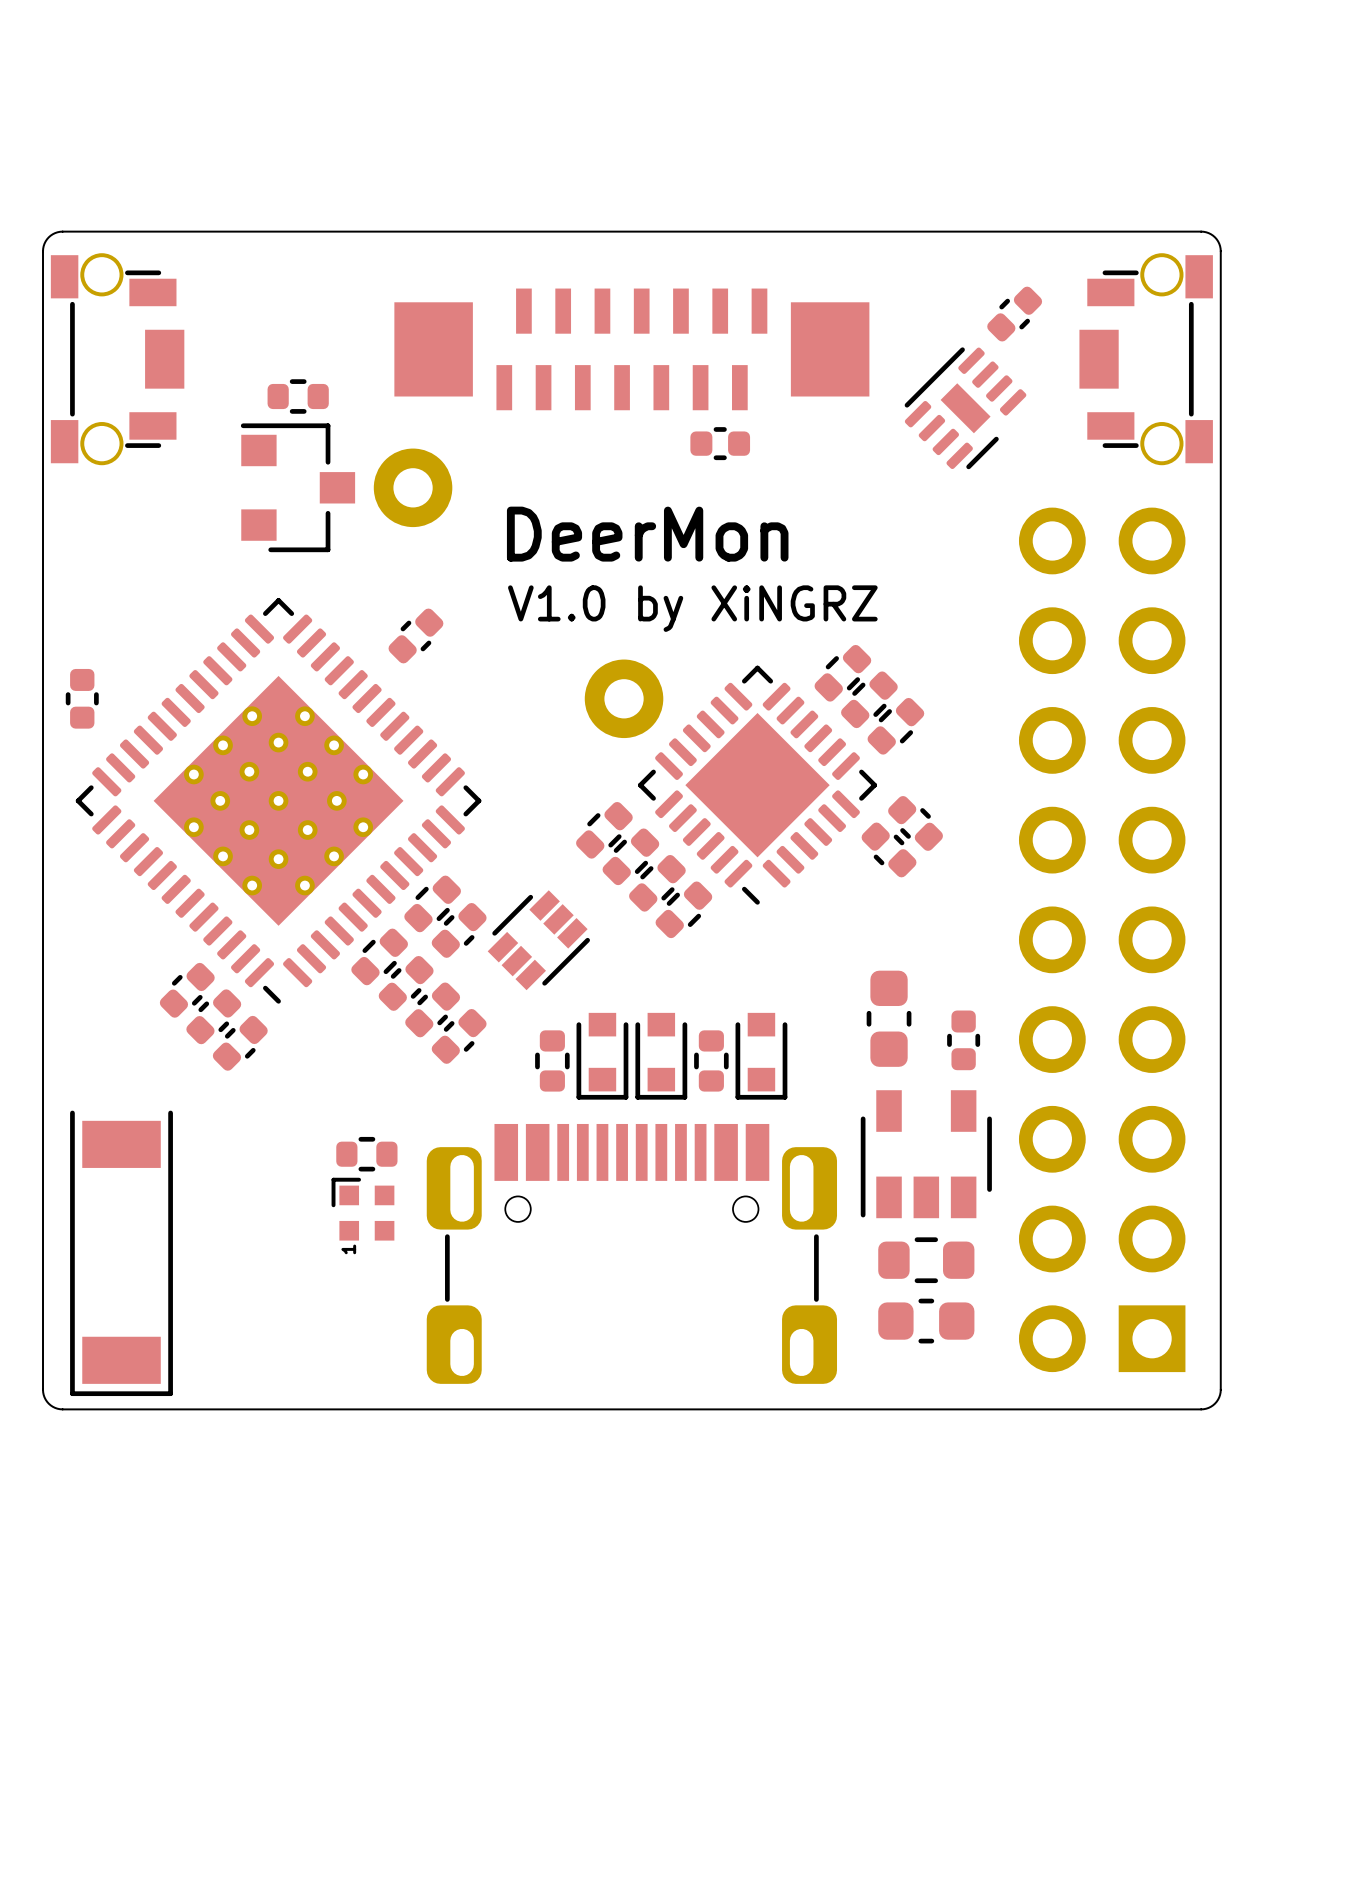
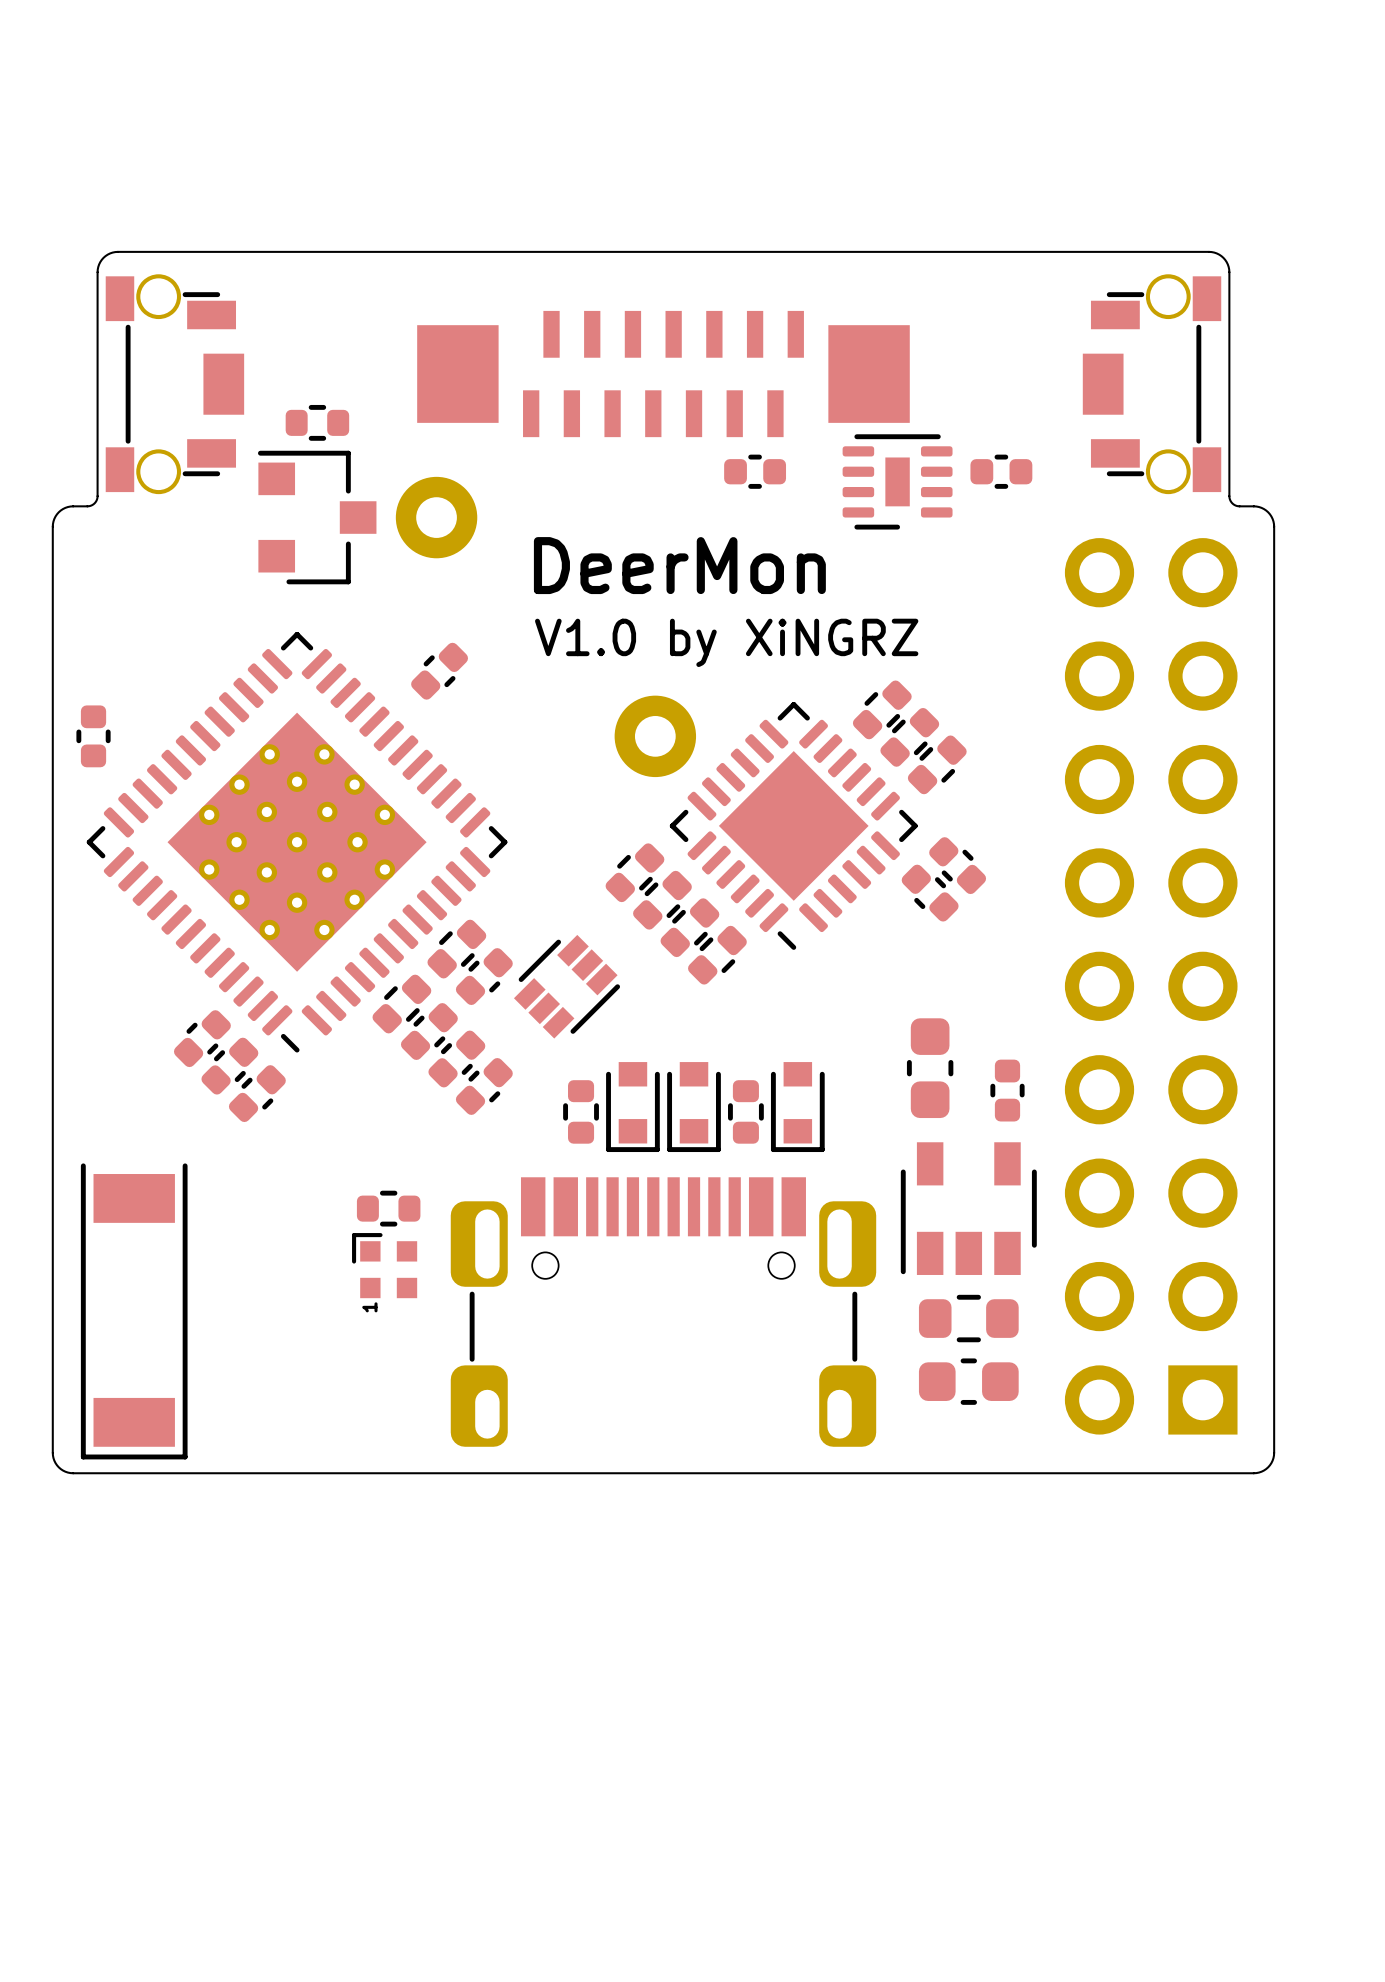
board edge: (105, 231) (57, 232) (48, 237) (43, 246) (43, 496) -> (117, 251) (110, 253) (103, 257) (97, 269) (97, 498) (90, 505) (70, 506) (62, 509) (55, 516) (52, 526)
board edge: (1157, 231) (1206, 232) (1215, 237) (1220, 246) (1220, 496) -> (1209, 251) (1216, 253) (1223, 257) (1229, 269) (1229, 498) (1236, 505) (1256, 506) (1263, 509) (1271, 516) (1274, 526)
part: (1014, 314) -> none
part footprint: [904, 347, 1027, 470] -> [970, 454, 1033, 489]
part position: (117, 359) -> (174, 384)
part position: (1146, 359) -> (1152, 384)
part: none -> (897, 481)

